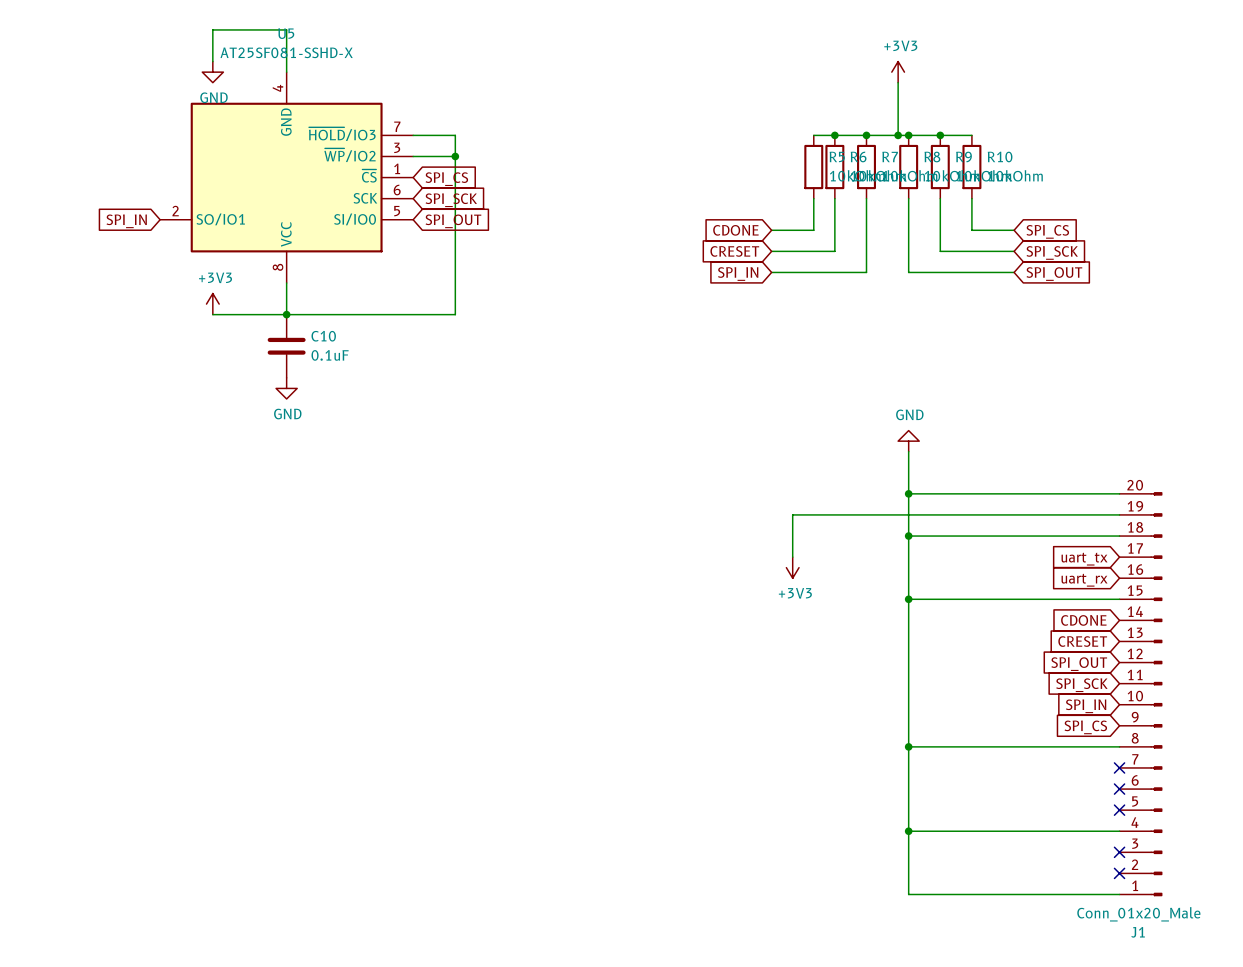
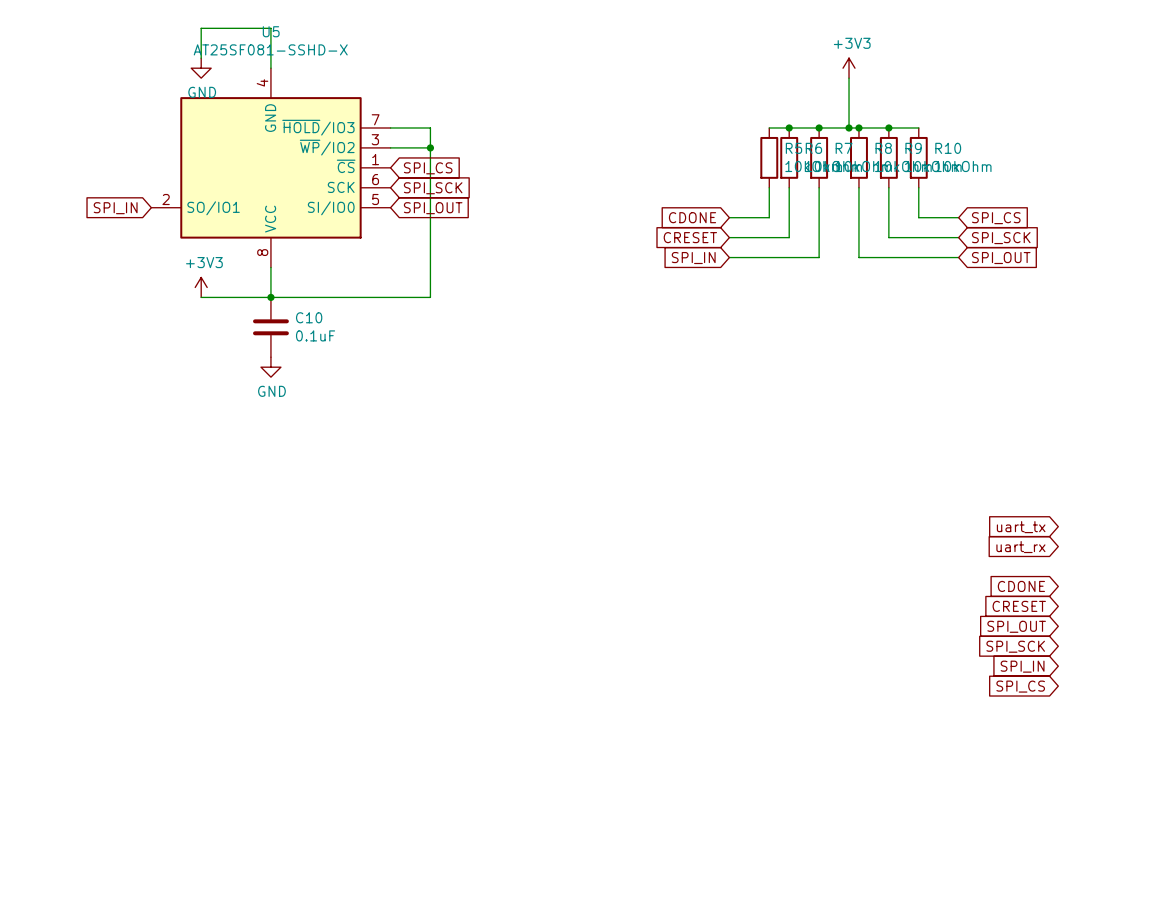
power symbol: GND (908, 441) -> none
wire: (908, 451) (908, 894) (1119, 894) -> none
wire: (908, 493) (1119, 493) -> none
junction: (908, 493) -> none
wire: (1119, 514) (792, 514) (792, 557) -> none
wire: (908, 536) (1119, 536) -> none
junction: (908, 536) -> none
power symbol: +3V3 (792, 567) -> none
wire: (908, 599) (1119, 599) -> none
junction: (908, 599) -> none
J1: Conn_01x20_Male (1140, 694) -> none
wire: (908, 746) (1119, 746) -> none
junction: (908, 746) -> none
no-connect mark: (1119, 767) -> none
no-connect mark: (1119, 789) -> none
no-connect mark: (1119, 810) -> none
wire: (908, 831) (1119, 831) -> none
junction: (908, 831) -> none
no-connect mark: (1119, 852) -> none
no-connect mark: (1119, 873) -> none

